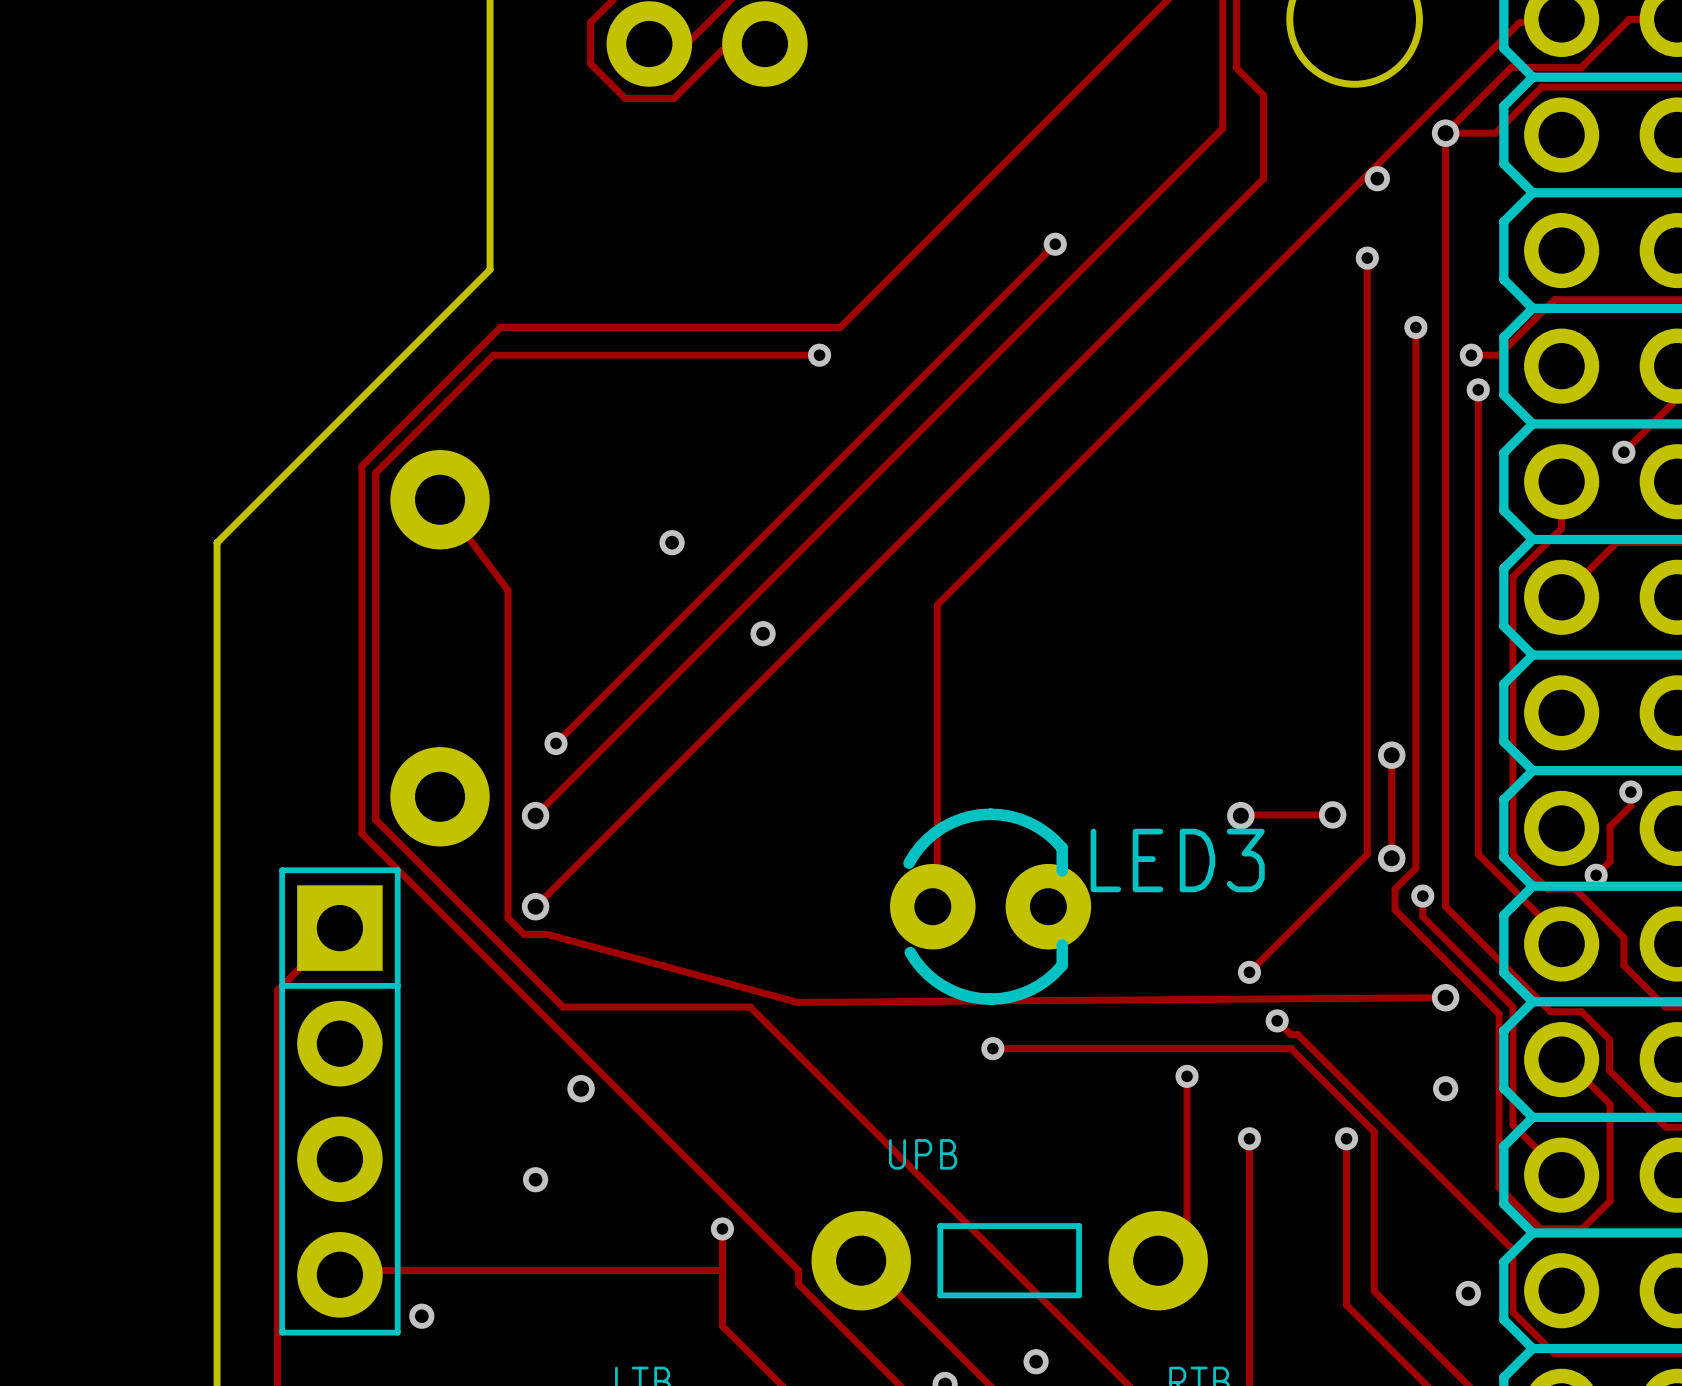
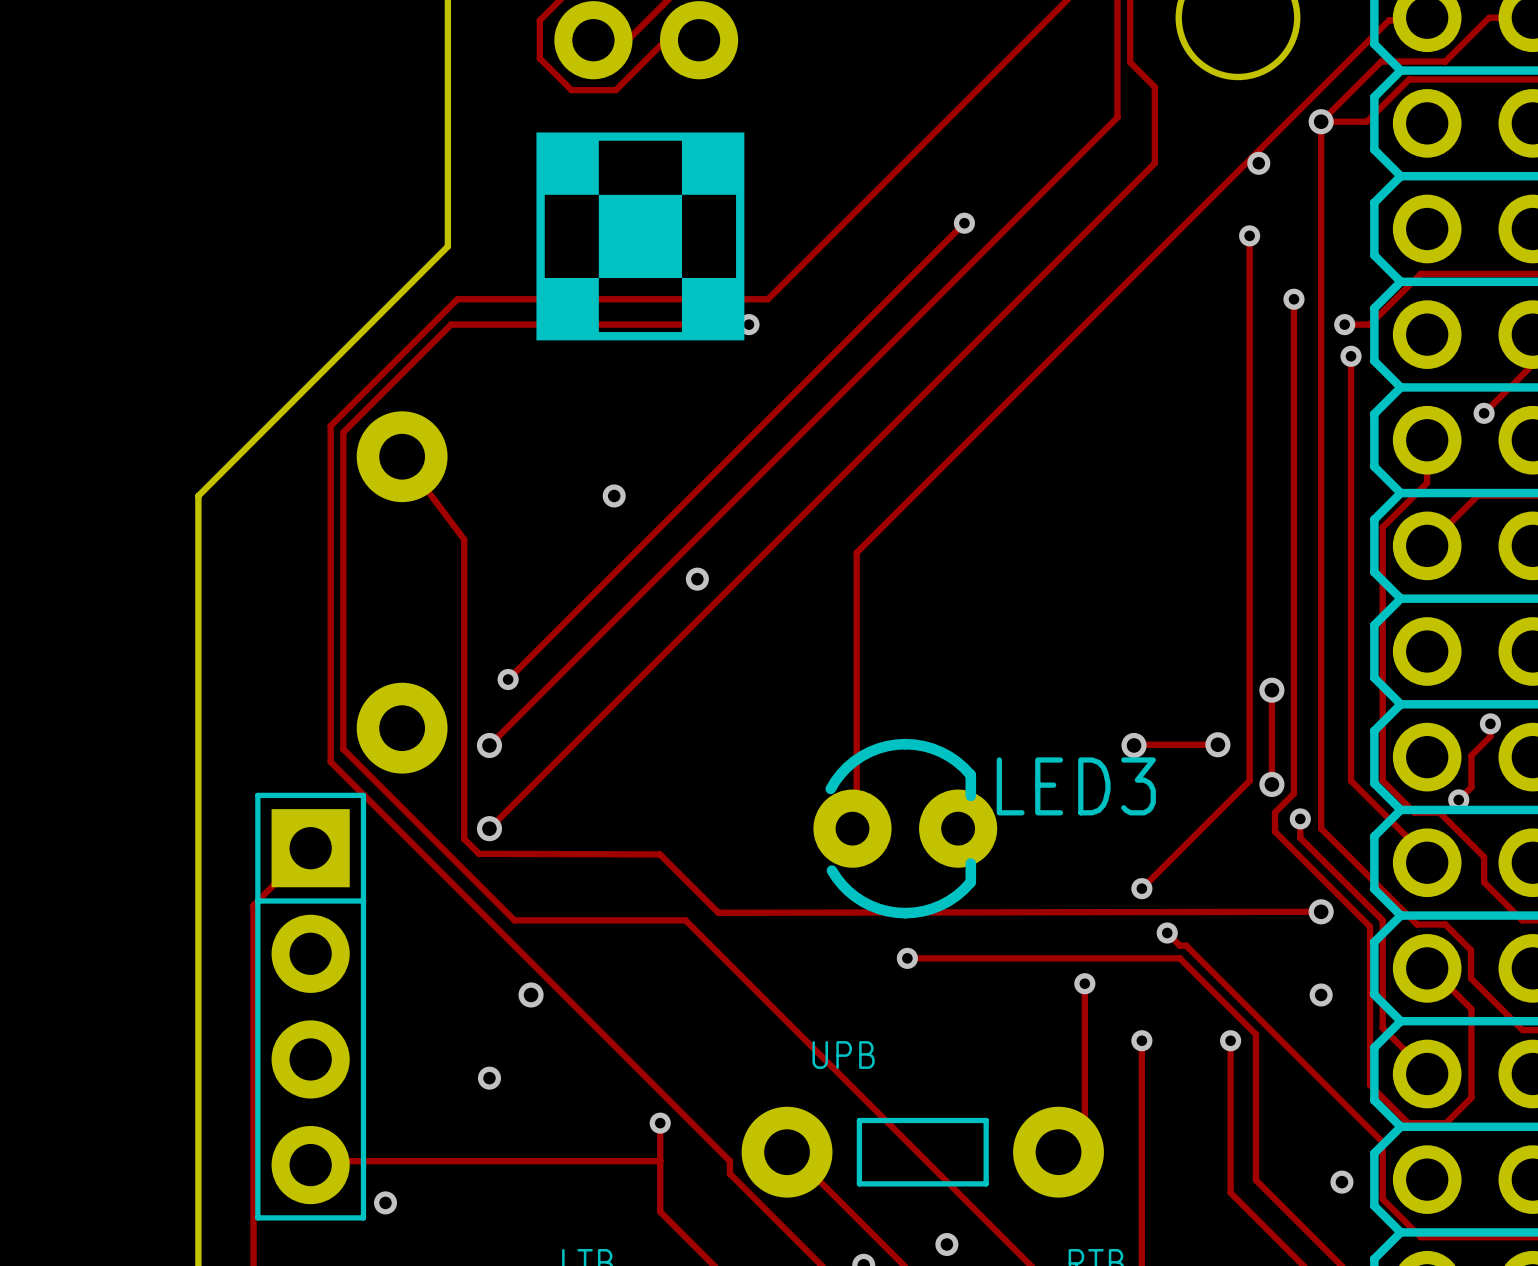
drawing: none -> [536, 132, 745, 341]
track: (547, 934) (797, 1002) (1445, 997) -> (499, 853) (659, 854) (718, 912) (1321, 911)

